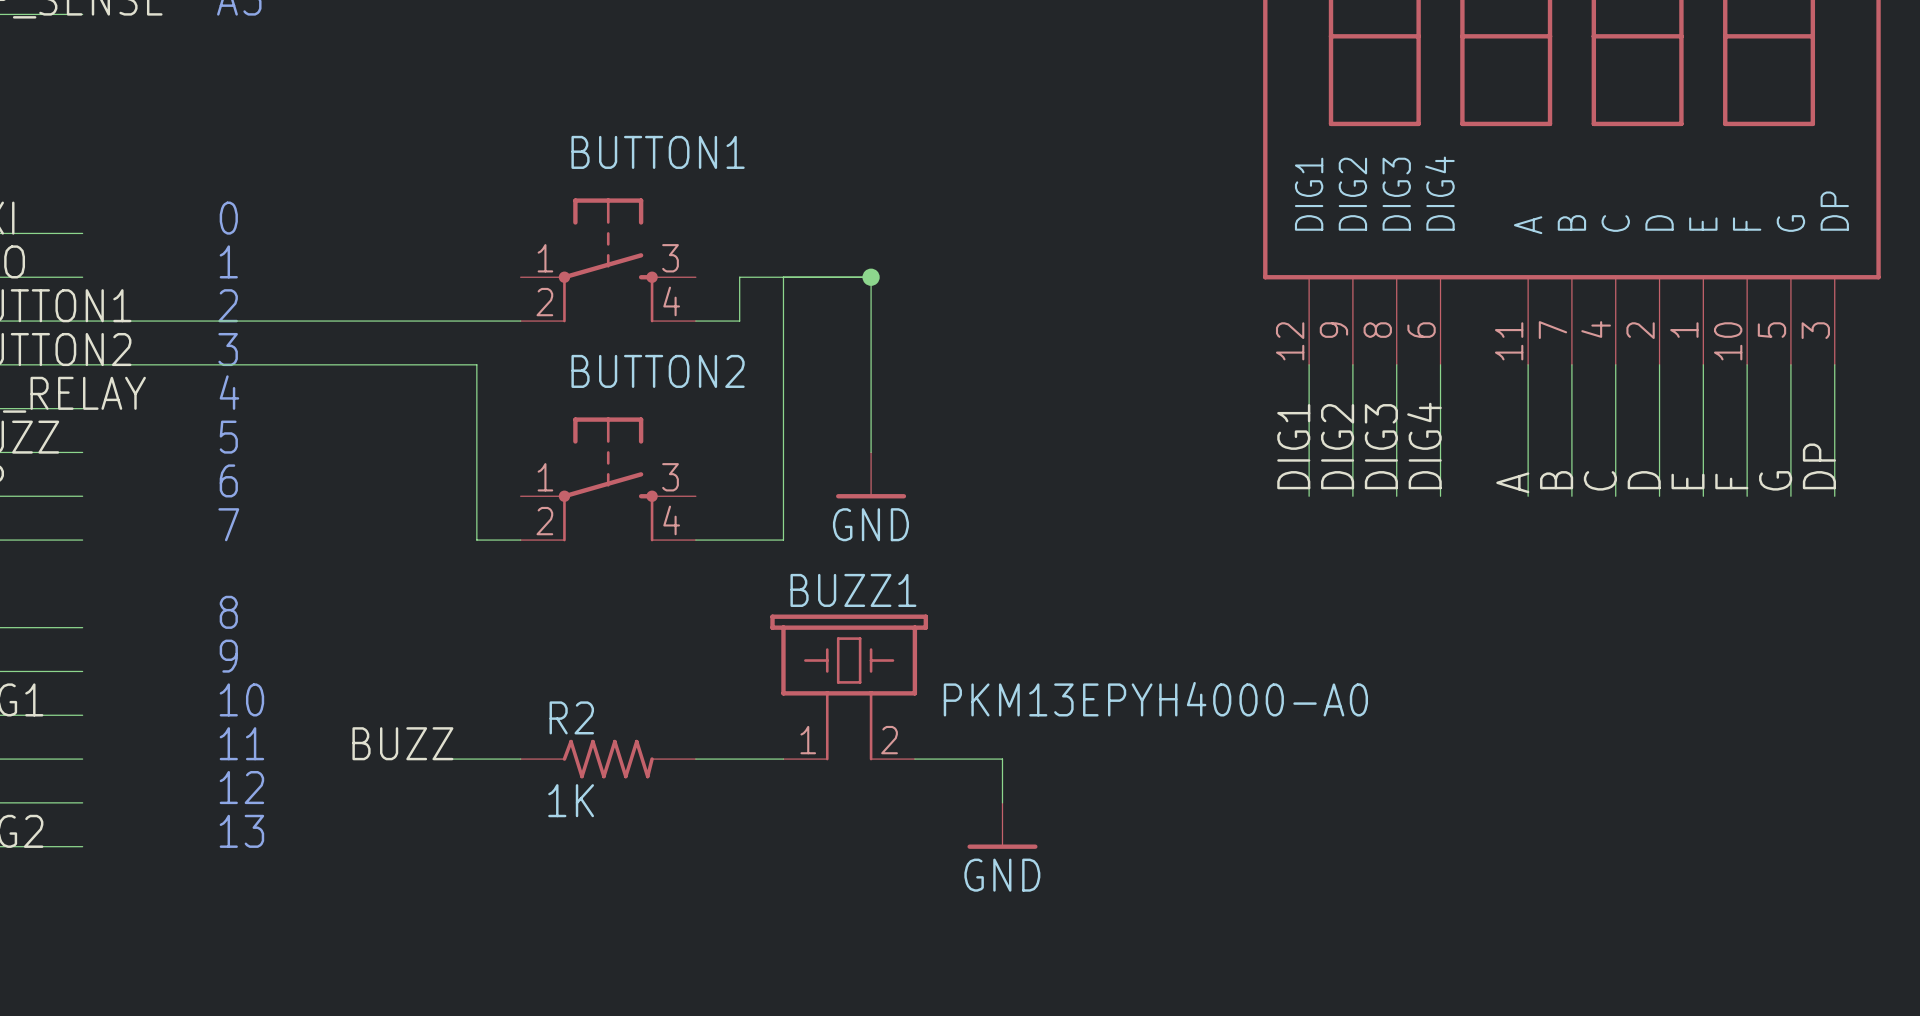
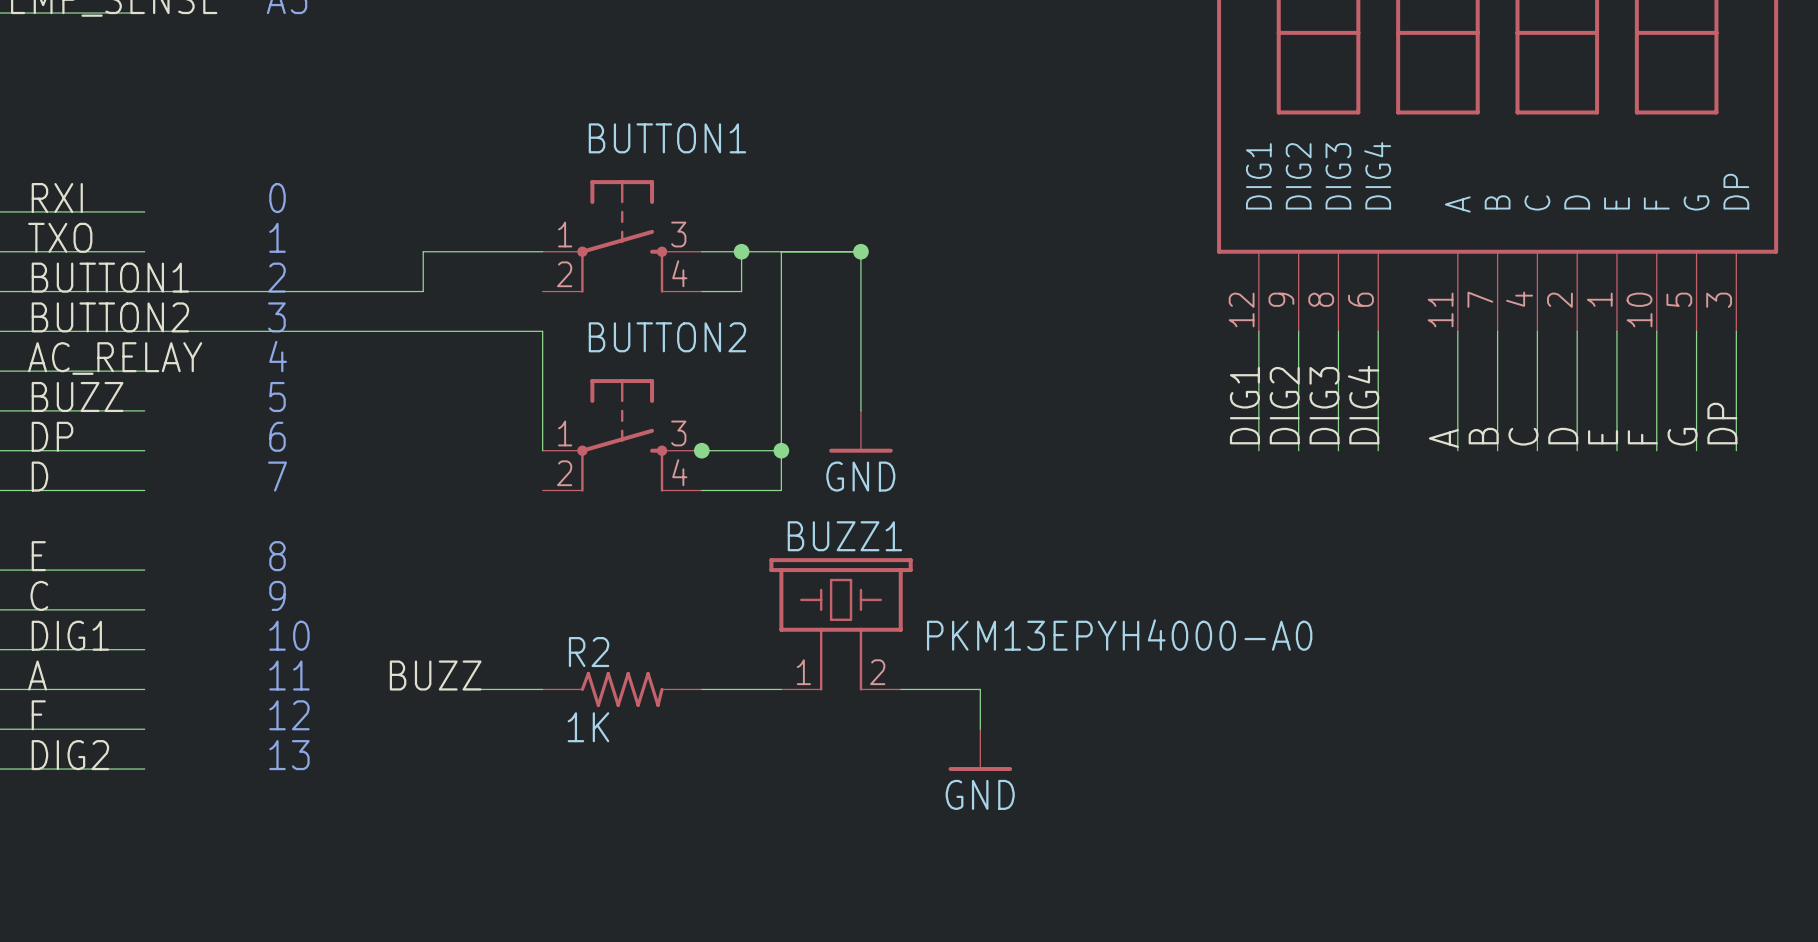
wire: none -> (701, 251) (741, 251)
junction: none -> (741, 251)
wire: (389, 321) (520, 321) -> (423, 291) (423, 251) (542, 251)
wire: (476, 364) (476, 540) (520, 540) -> (502, 331) (542, 331) (542, 450)
wire: none -> (701, 450) (781, 450)
junction: none -> (701, 450)
junction: none -> (781, 450)

